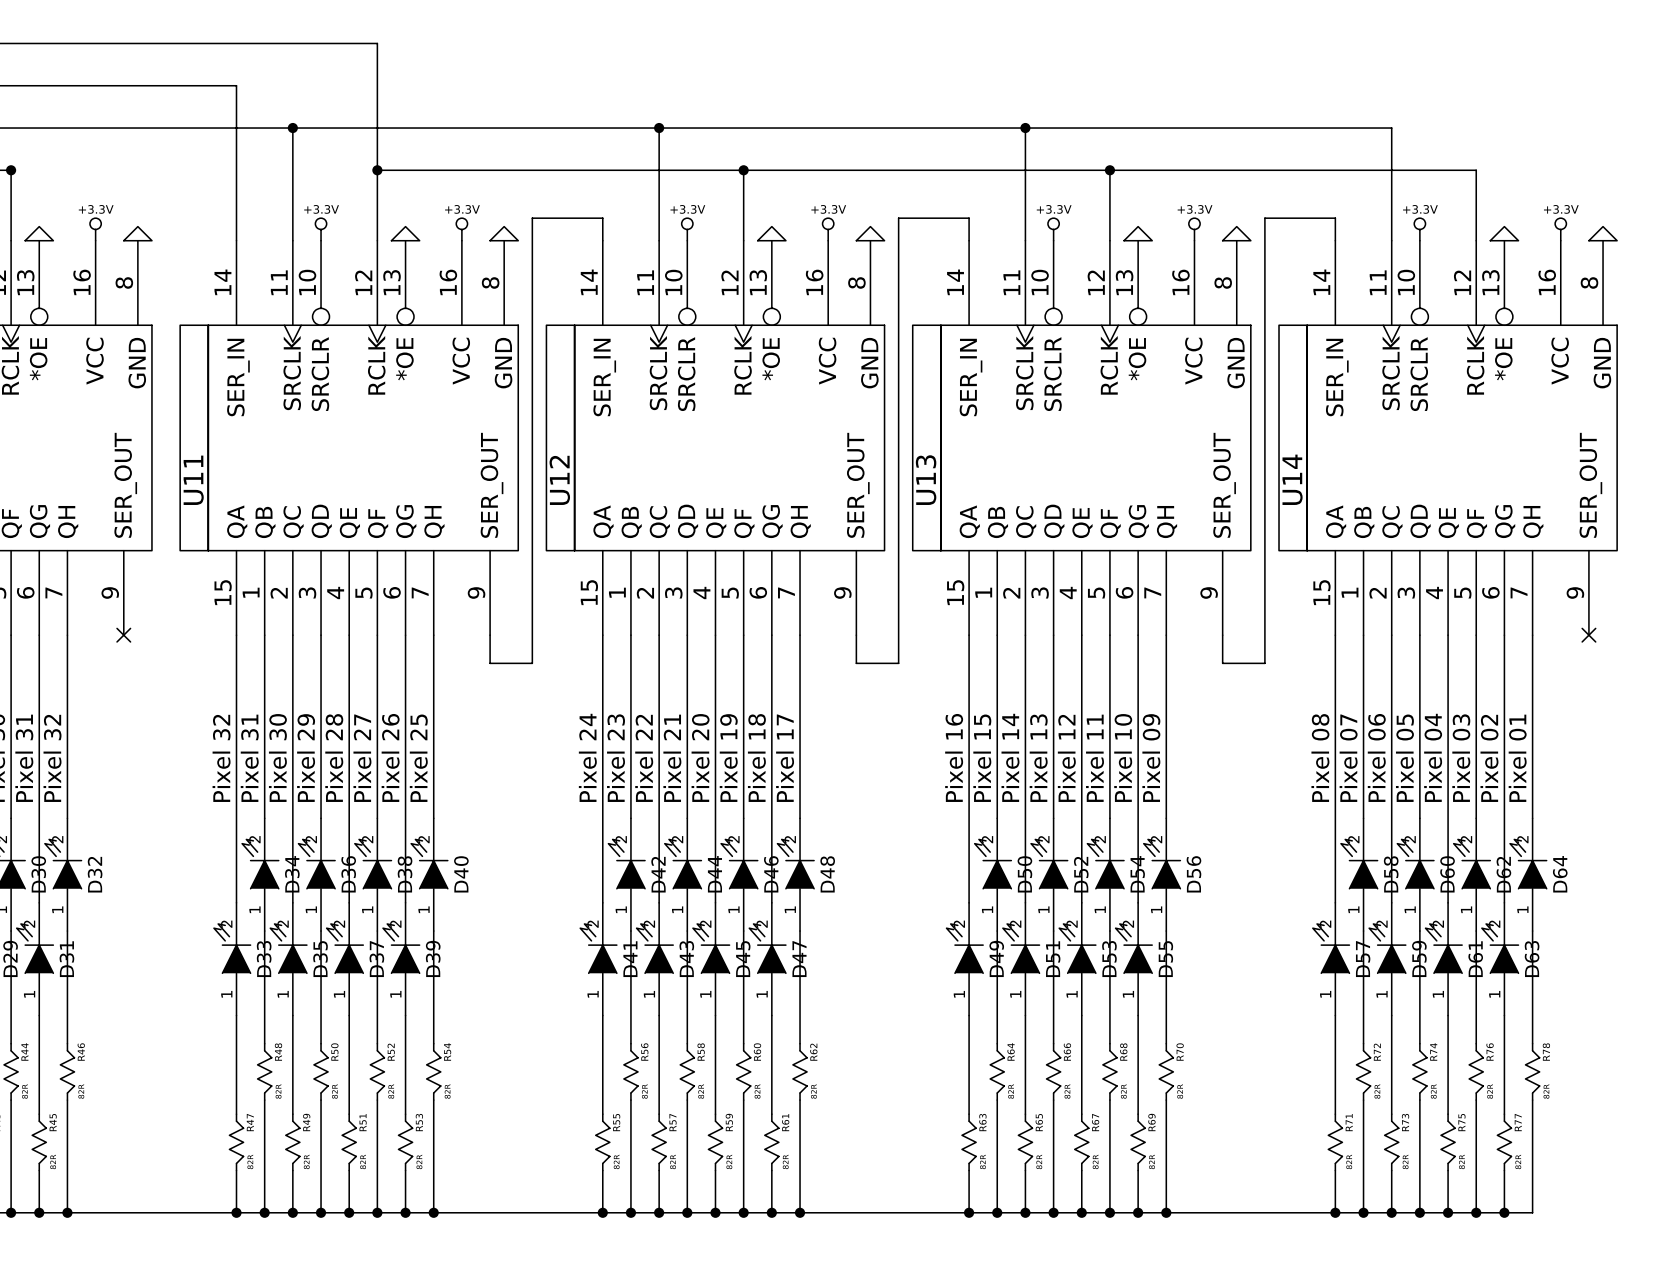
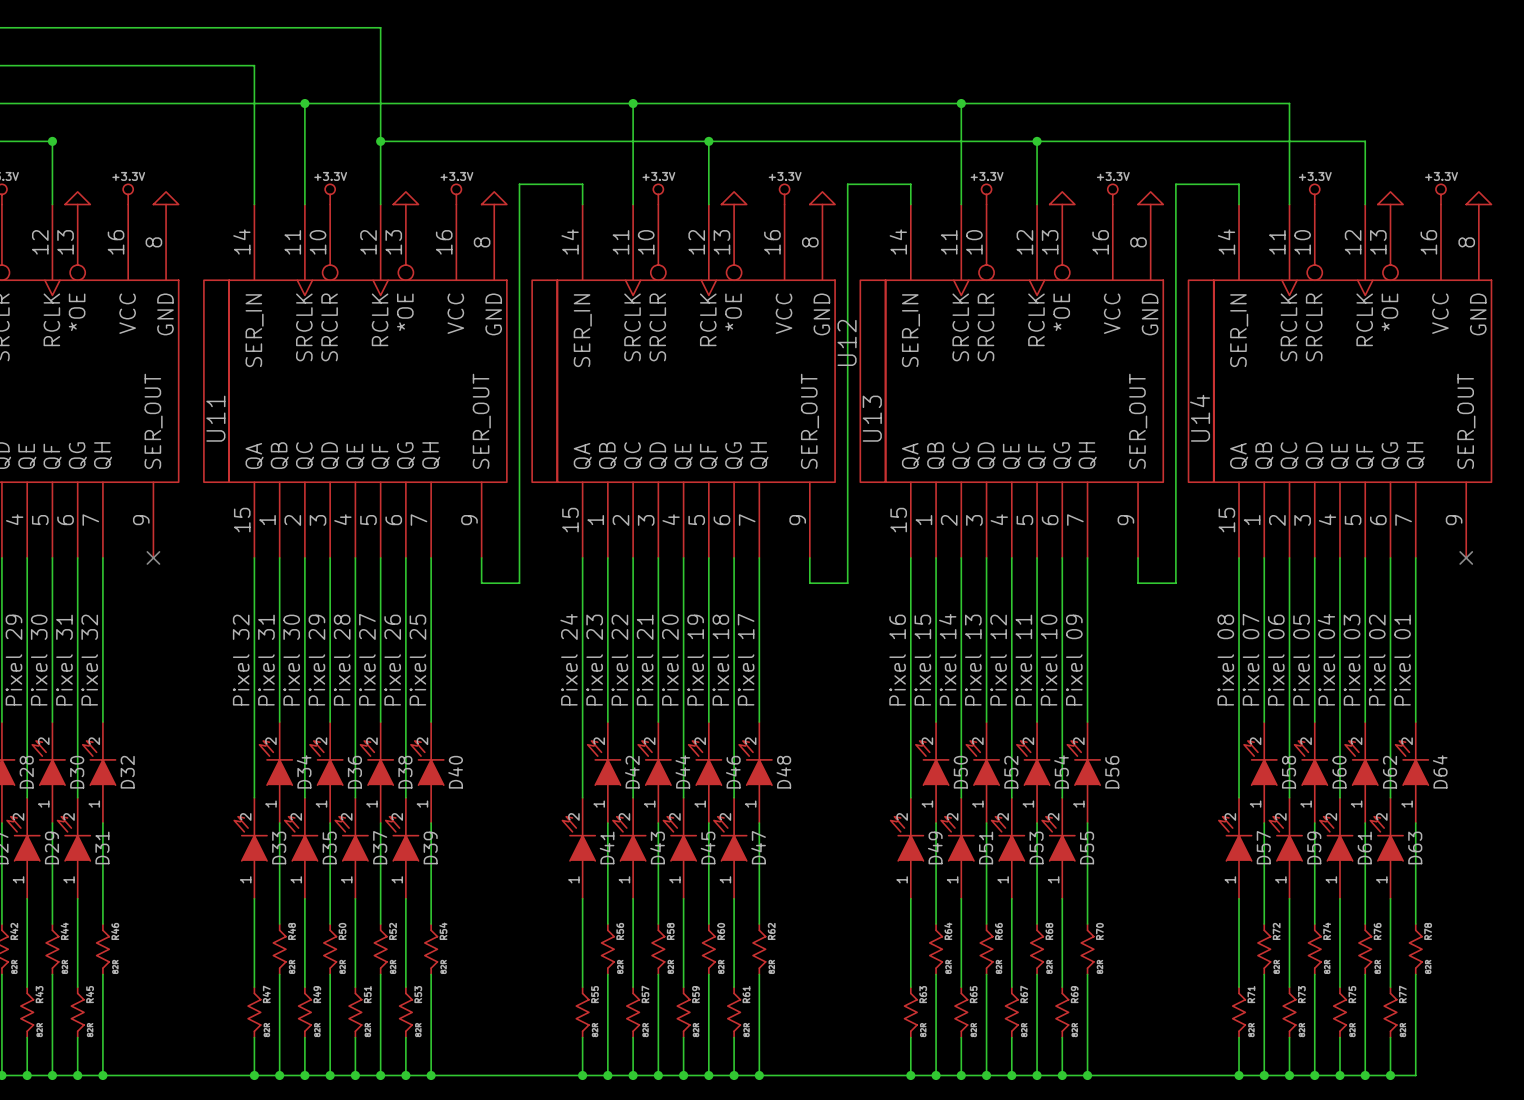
U12 name position: U12 (559, 480) -> U12 (847, 342)

